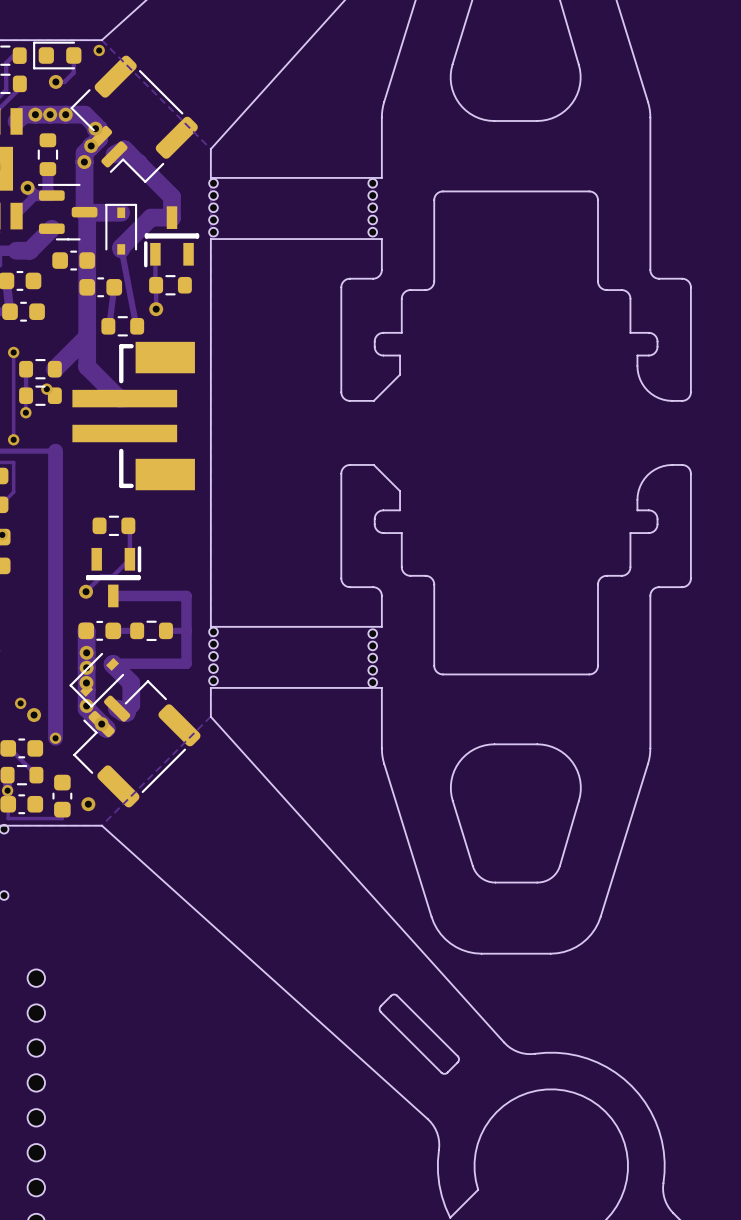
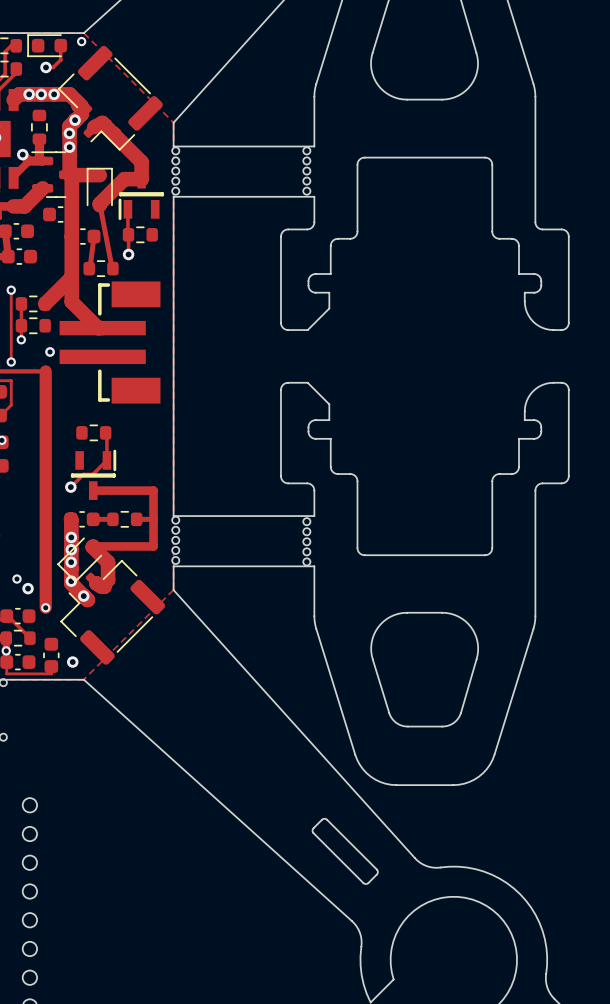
via position: (95, 128) -> (69, 147)
via: (46, 389) -> none
via: none -> (50, 351)

